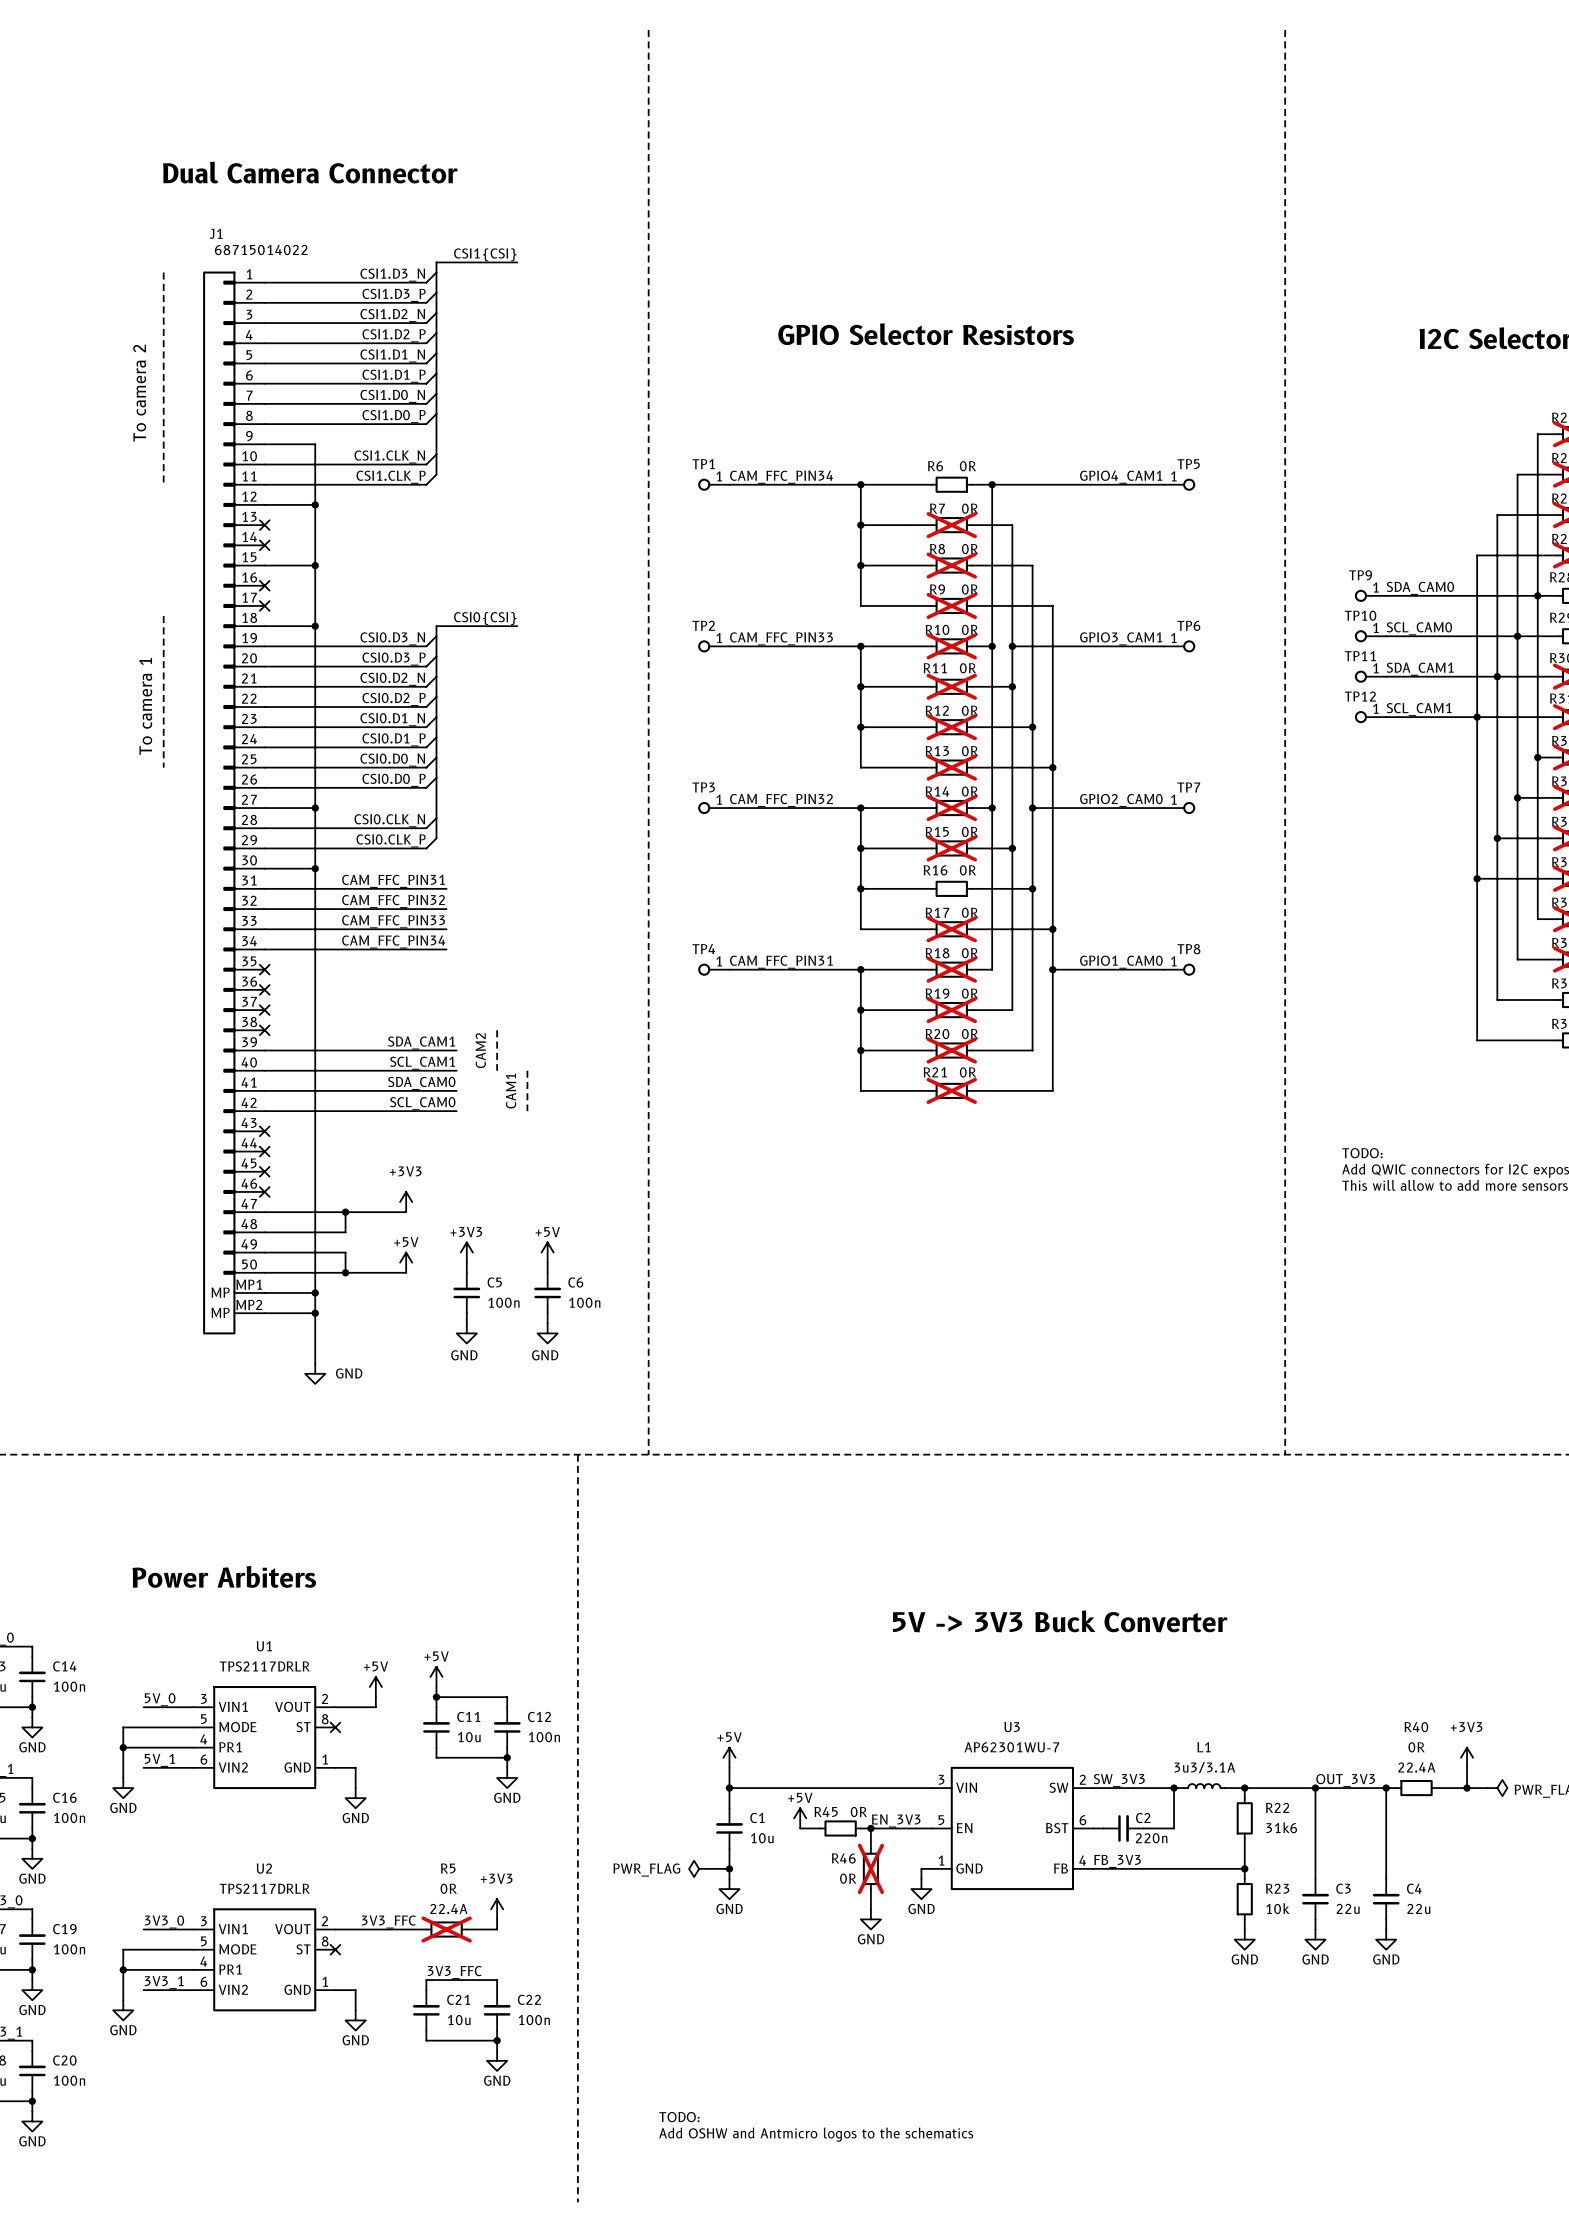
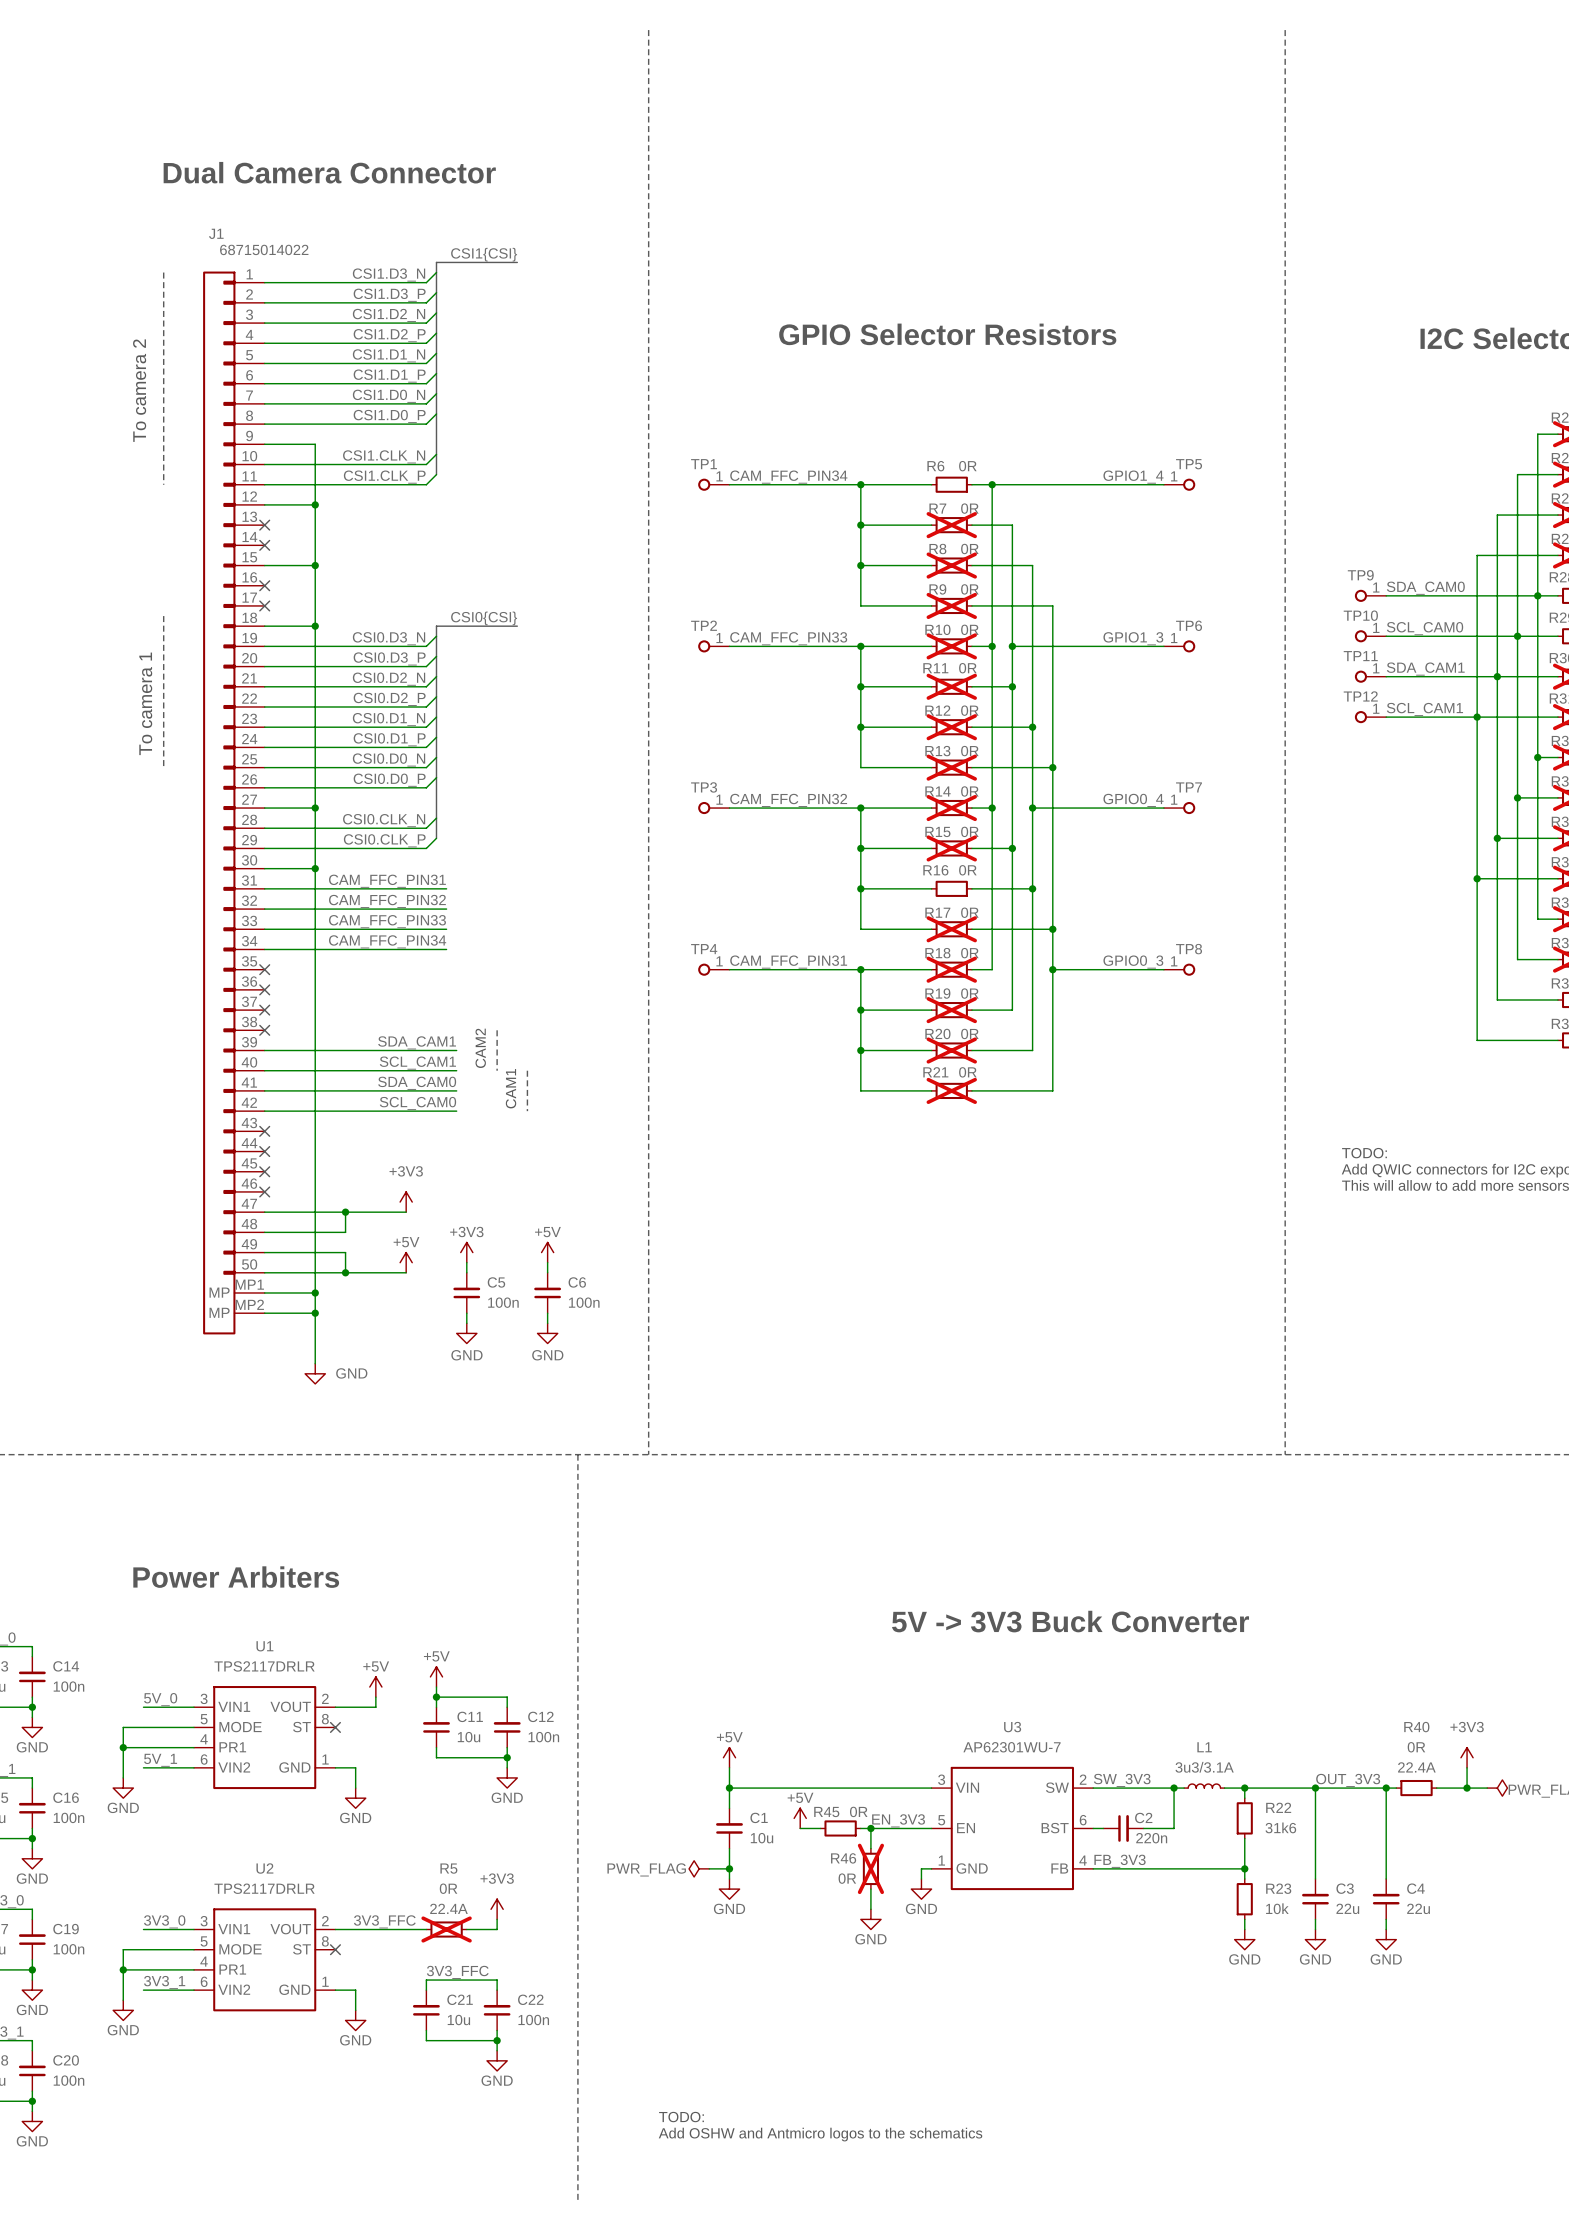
label: GPIO4_CAM1 (1121, 477) -> GPIO1_4 (1133, 477)
label: GPIO3_CAM1 (1121, 638) -> GPIO1_3 (1133, 638)
label: GPIO2_CAM0 (1121, 800) -> GPIO0_4 (1133, 800)
label: GPIO1_CAM0 (1121, 962) -> GPIO0_3 (1133, 962)

